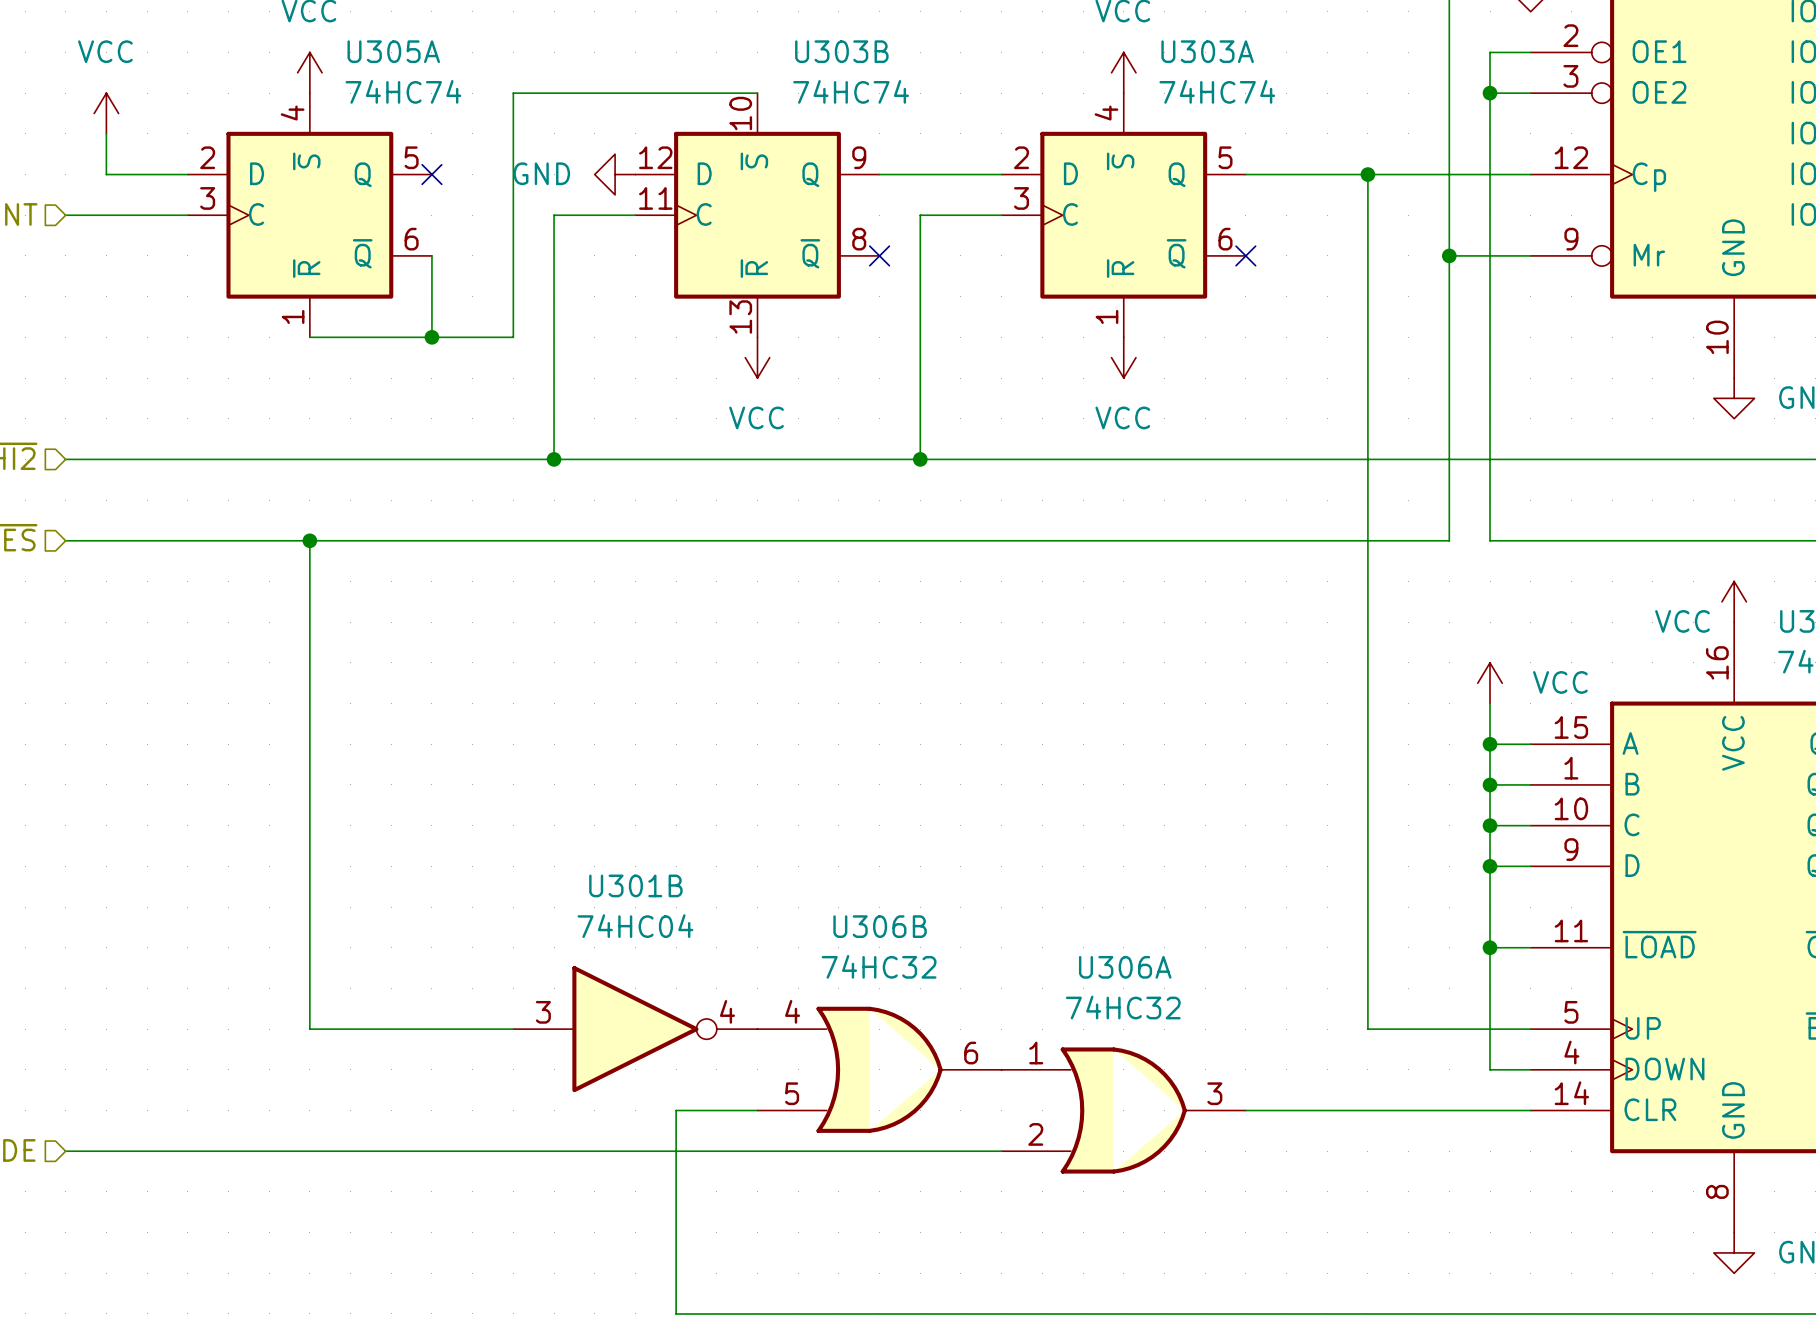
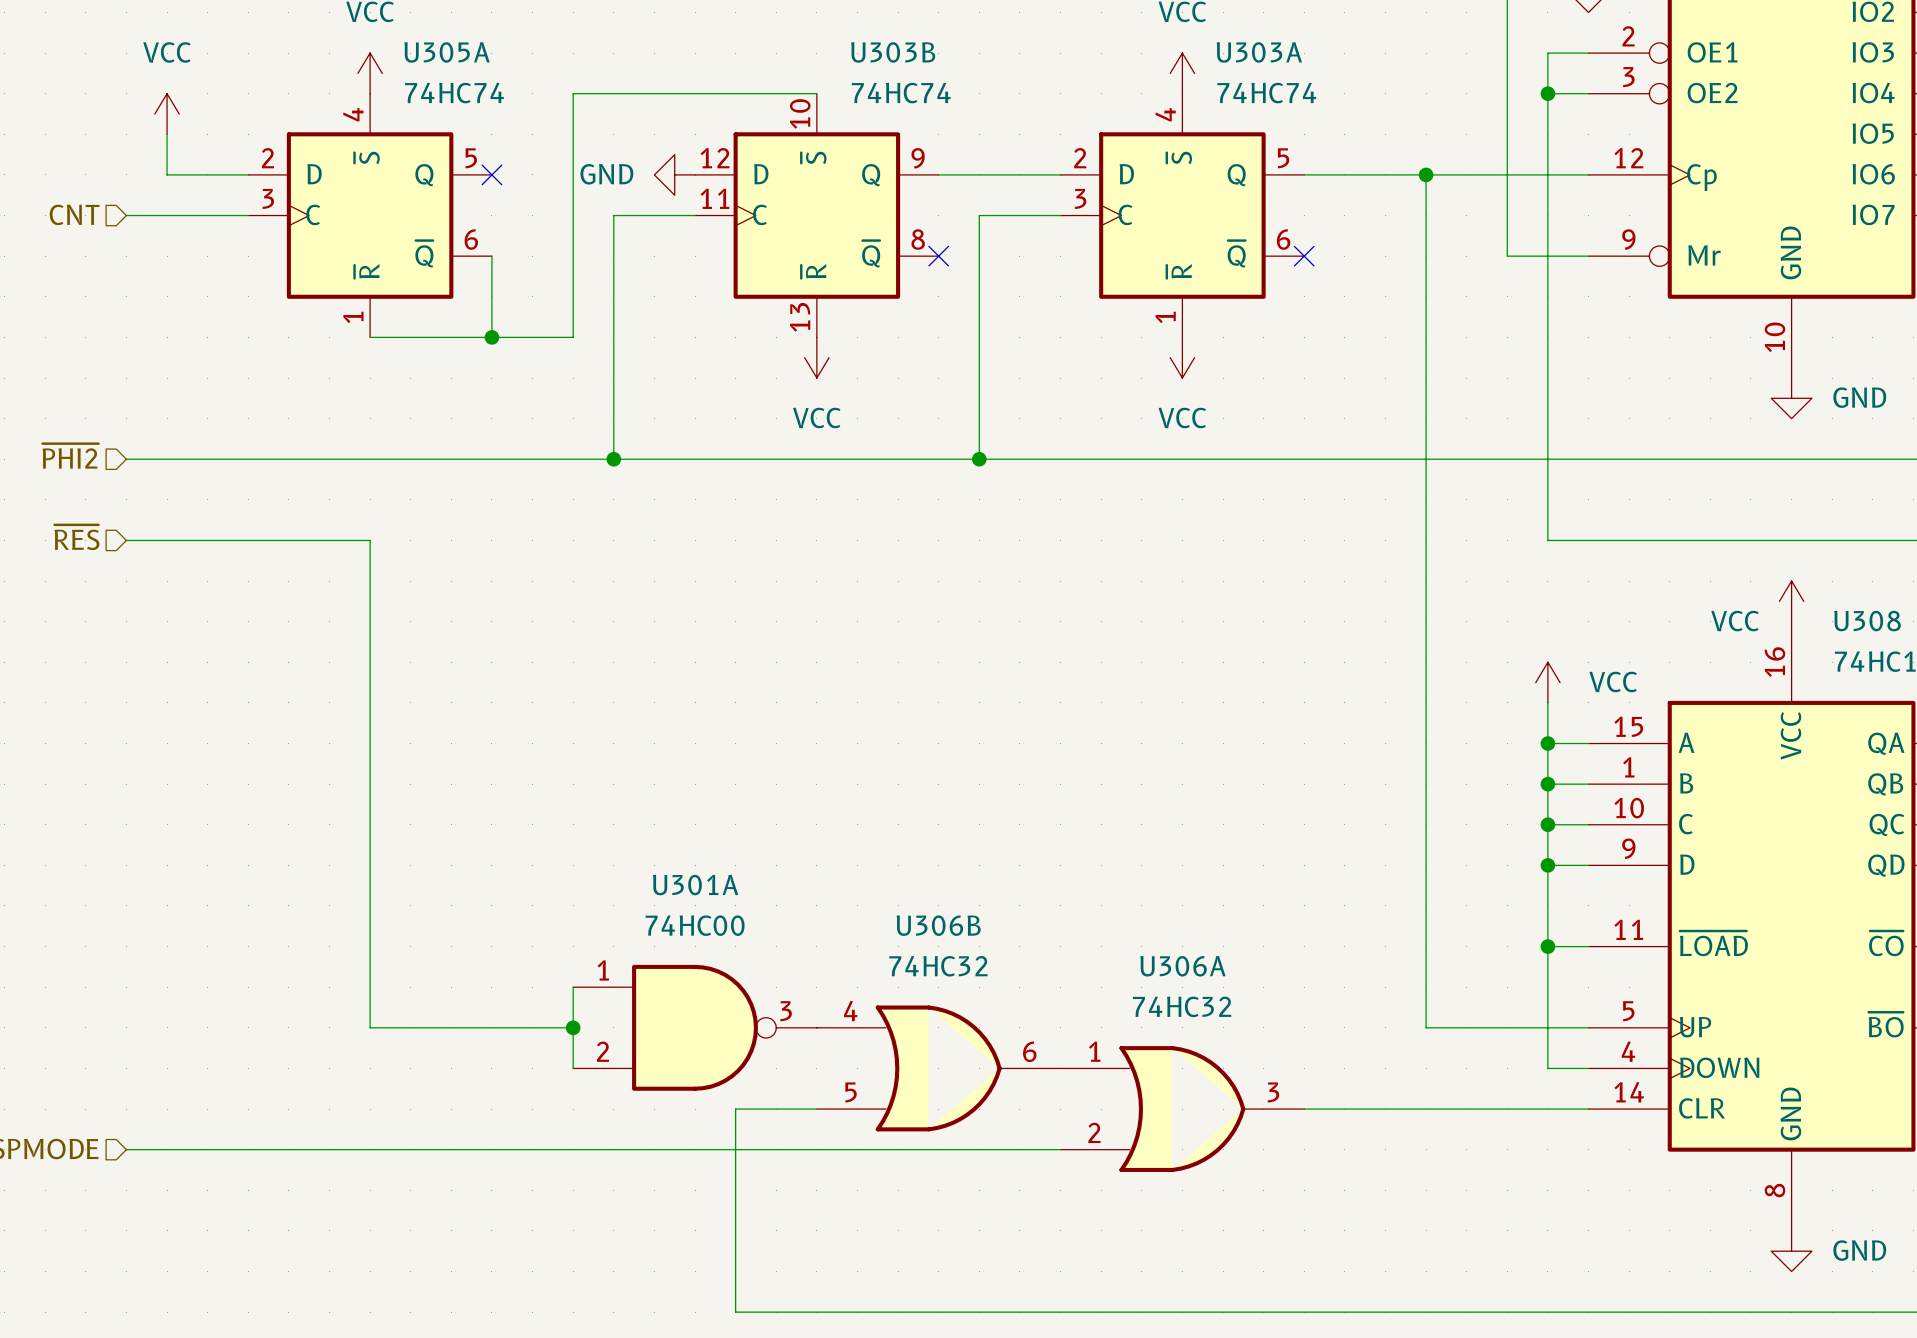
wire: (1449, 255) (1449, 540) (309, 540) -> none
junction: (1449, 255) -> none
junction: (309, 540) -> none
wire: none -> (573, 987) (573, 1068)
junction: none -> (573, 1027)
U301B: 74HC04 (635, 1029) -> none
U301A: none -> 74HC00 (695, 1027)

